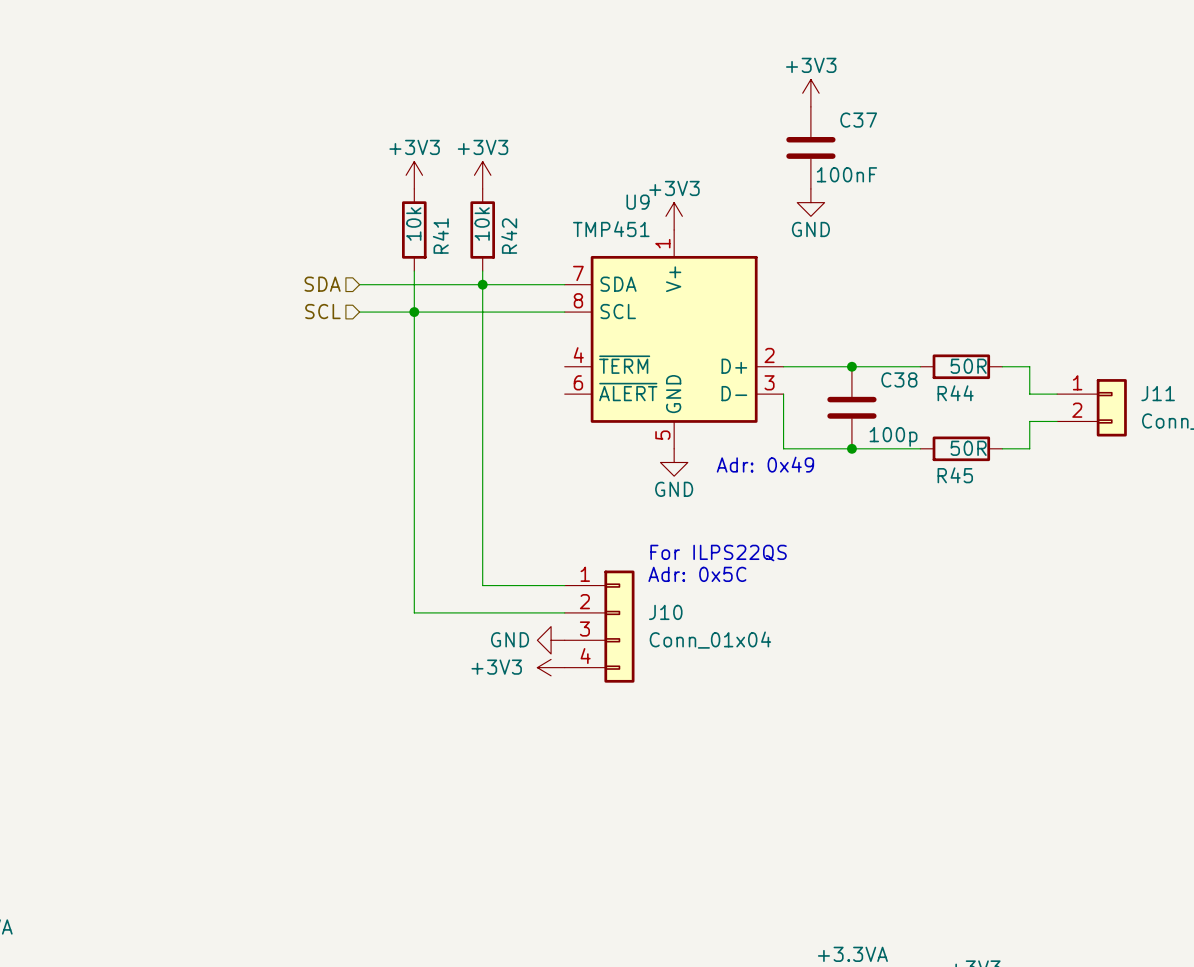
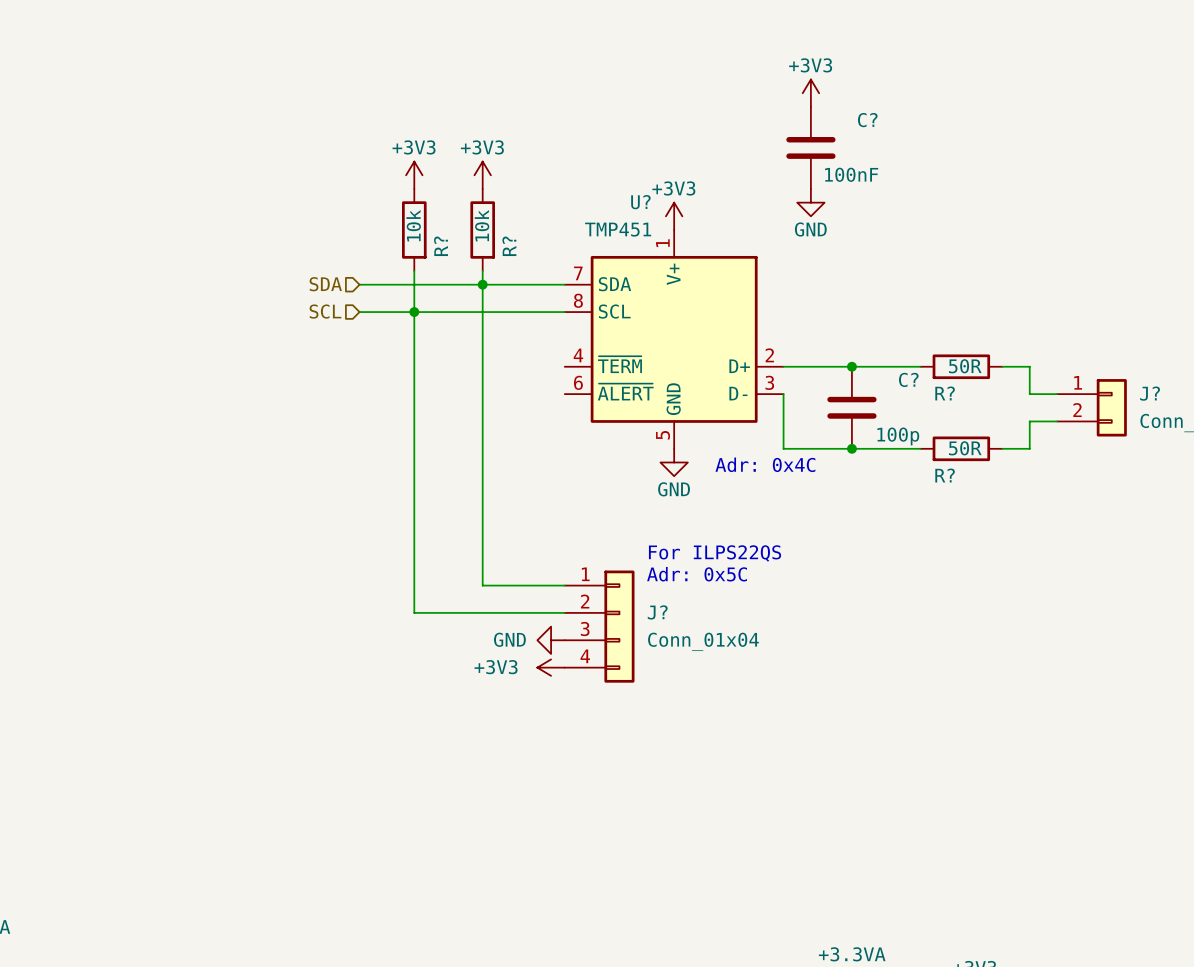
C37 name: C37 (858, 120) -> C? (867, 120)
U9 name: U9 (637, 202) -> U? (640, 202)
R41 name: R41 (440, 236) -> R? (441, 246)
R42 name: R42 (509, 236) -> R? (509, 246)
C38 name: C38 (899, 379) -> C? (908, 379)
R44 name: R44 (955, 393) -> R? (945, 393)
J11 name: J11 (1158, 393) -> J? (1150, 393)
text: Adr: 0x49 (765, 464) -> Adr: 0x4C (765, 464)
R45 name: R45 (955, 475) -> R? (945, 475)
J10 name: J10 (665, 612) -> J? (657, 612)

